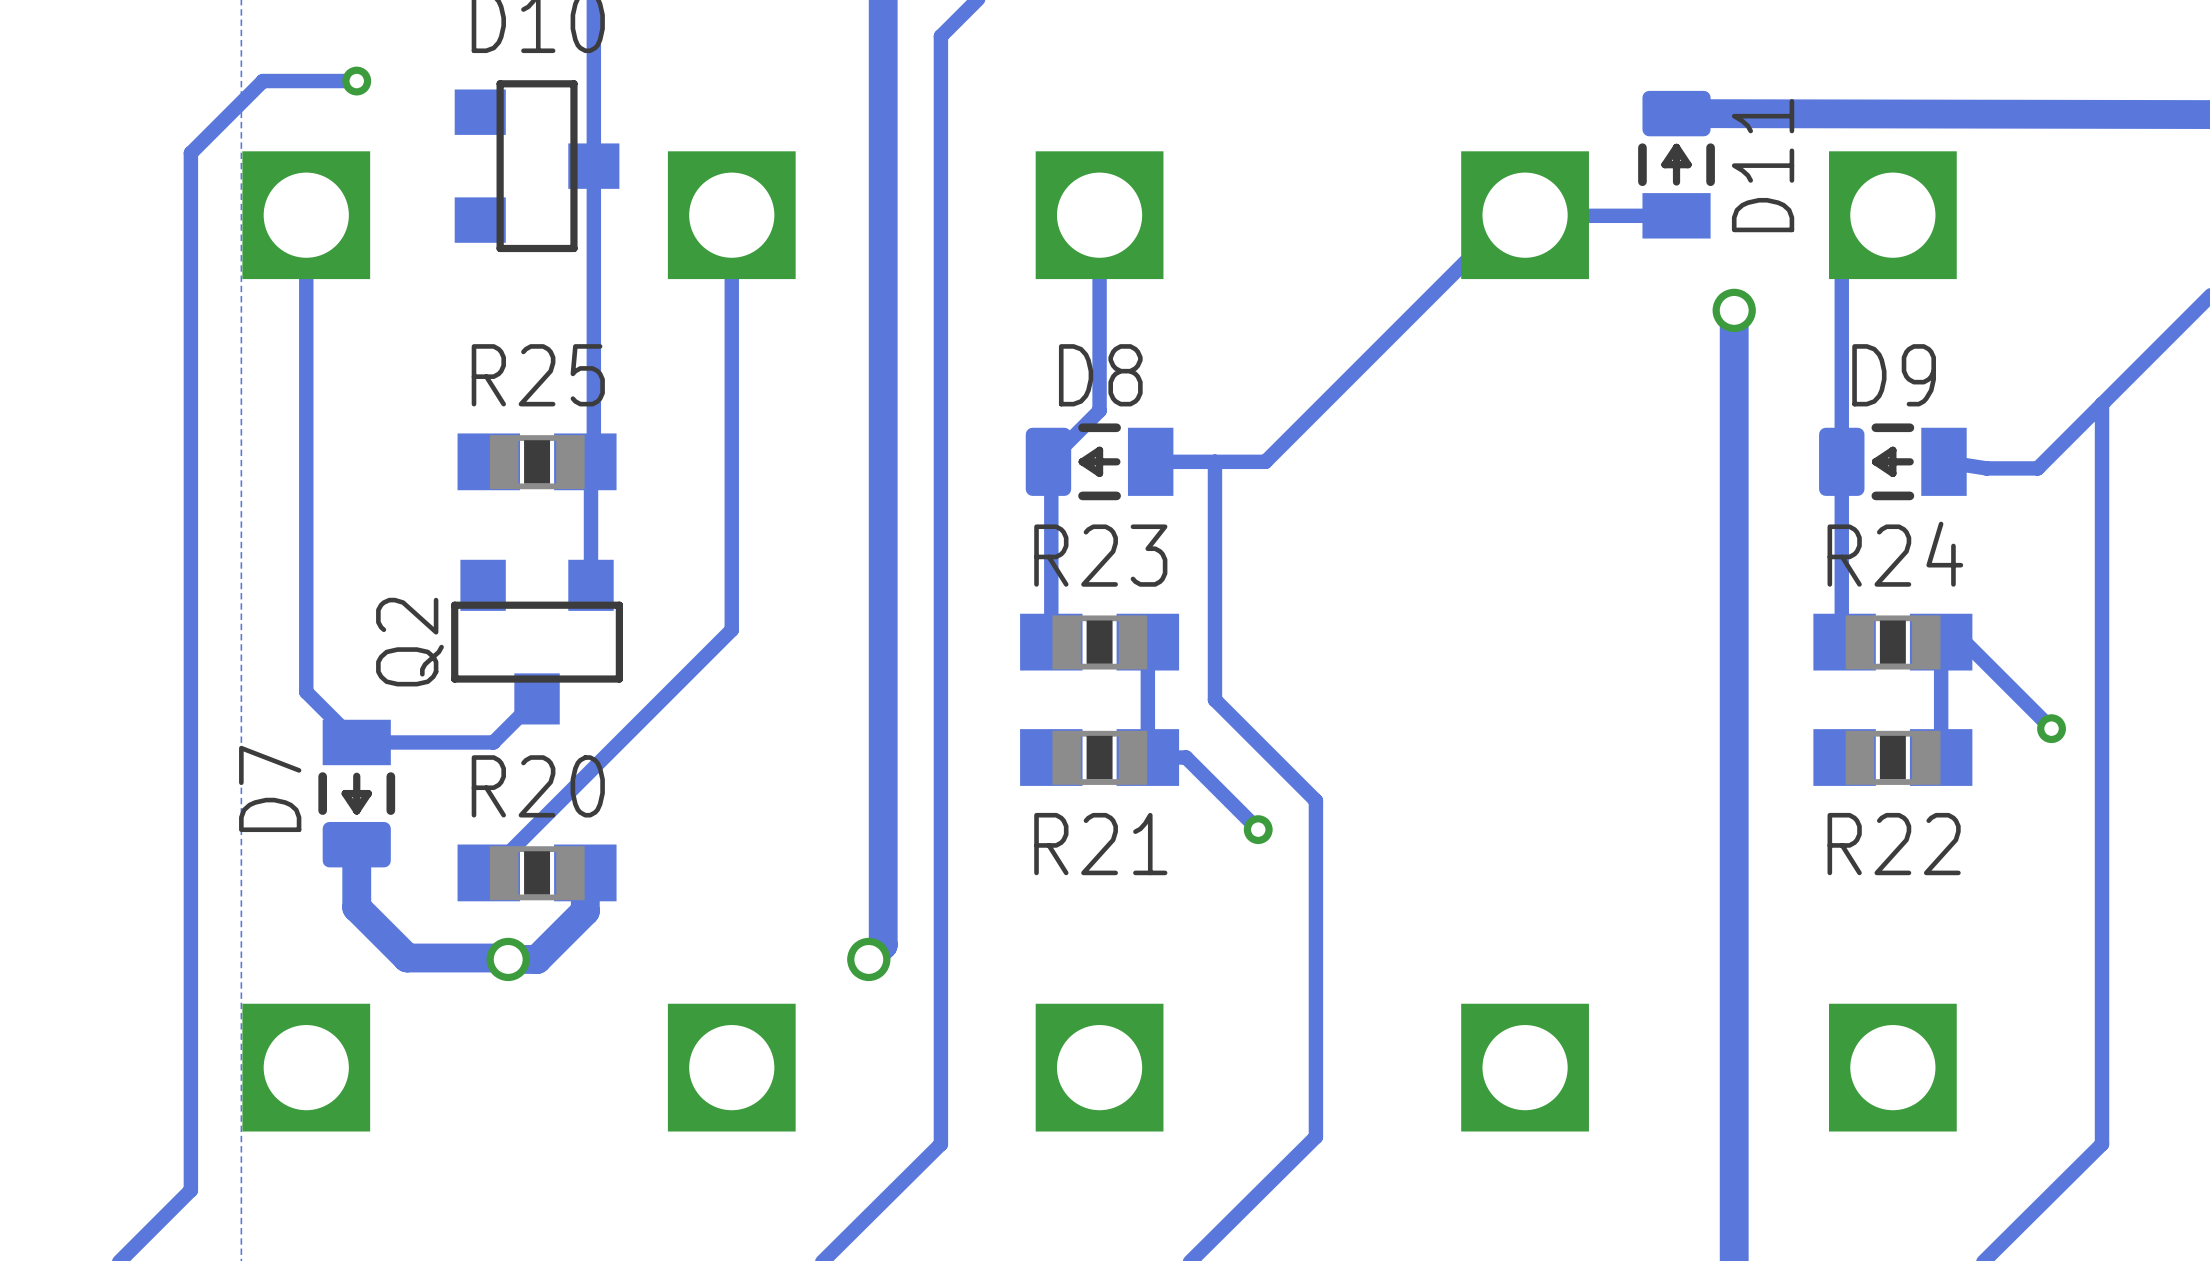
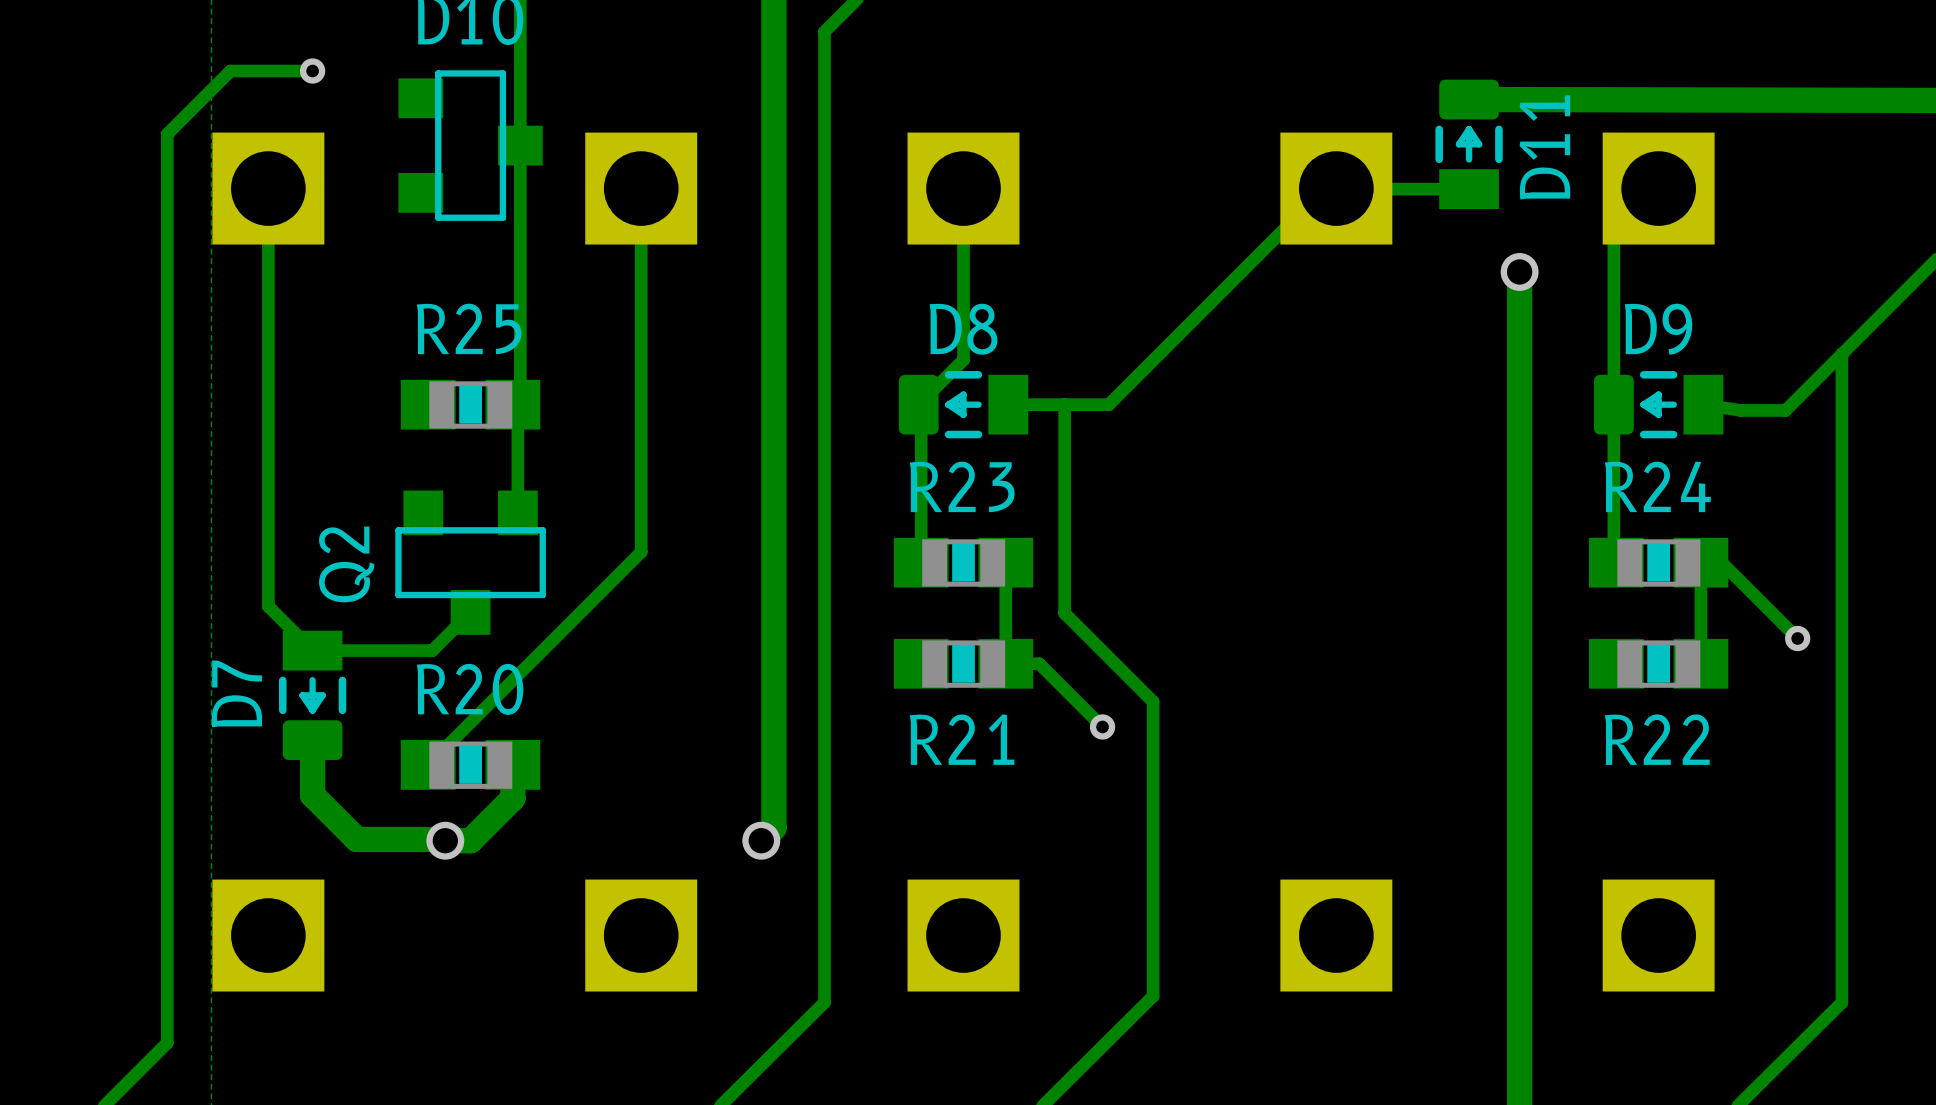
Q2 name position: Q2 (409, 642) -> Q2 (346, 564)

